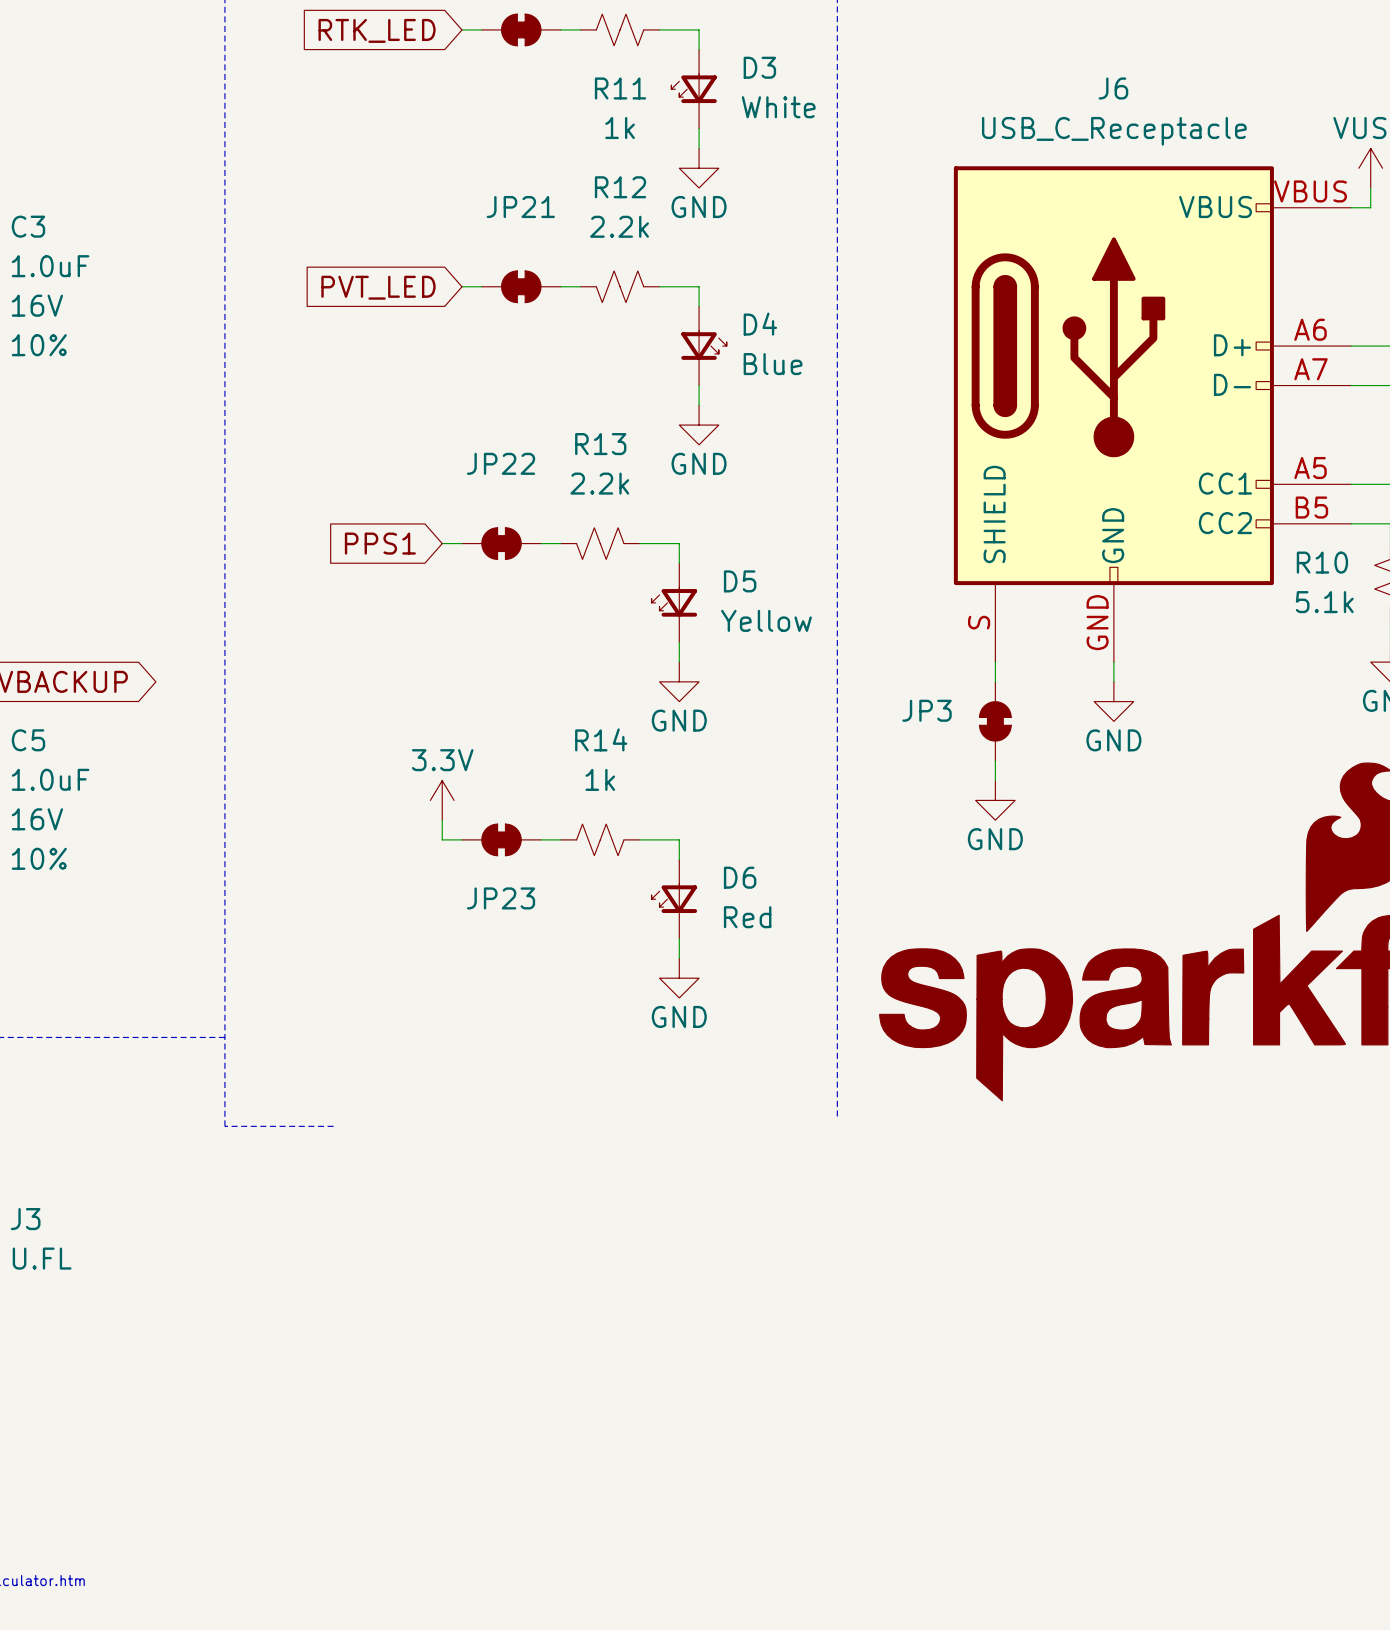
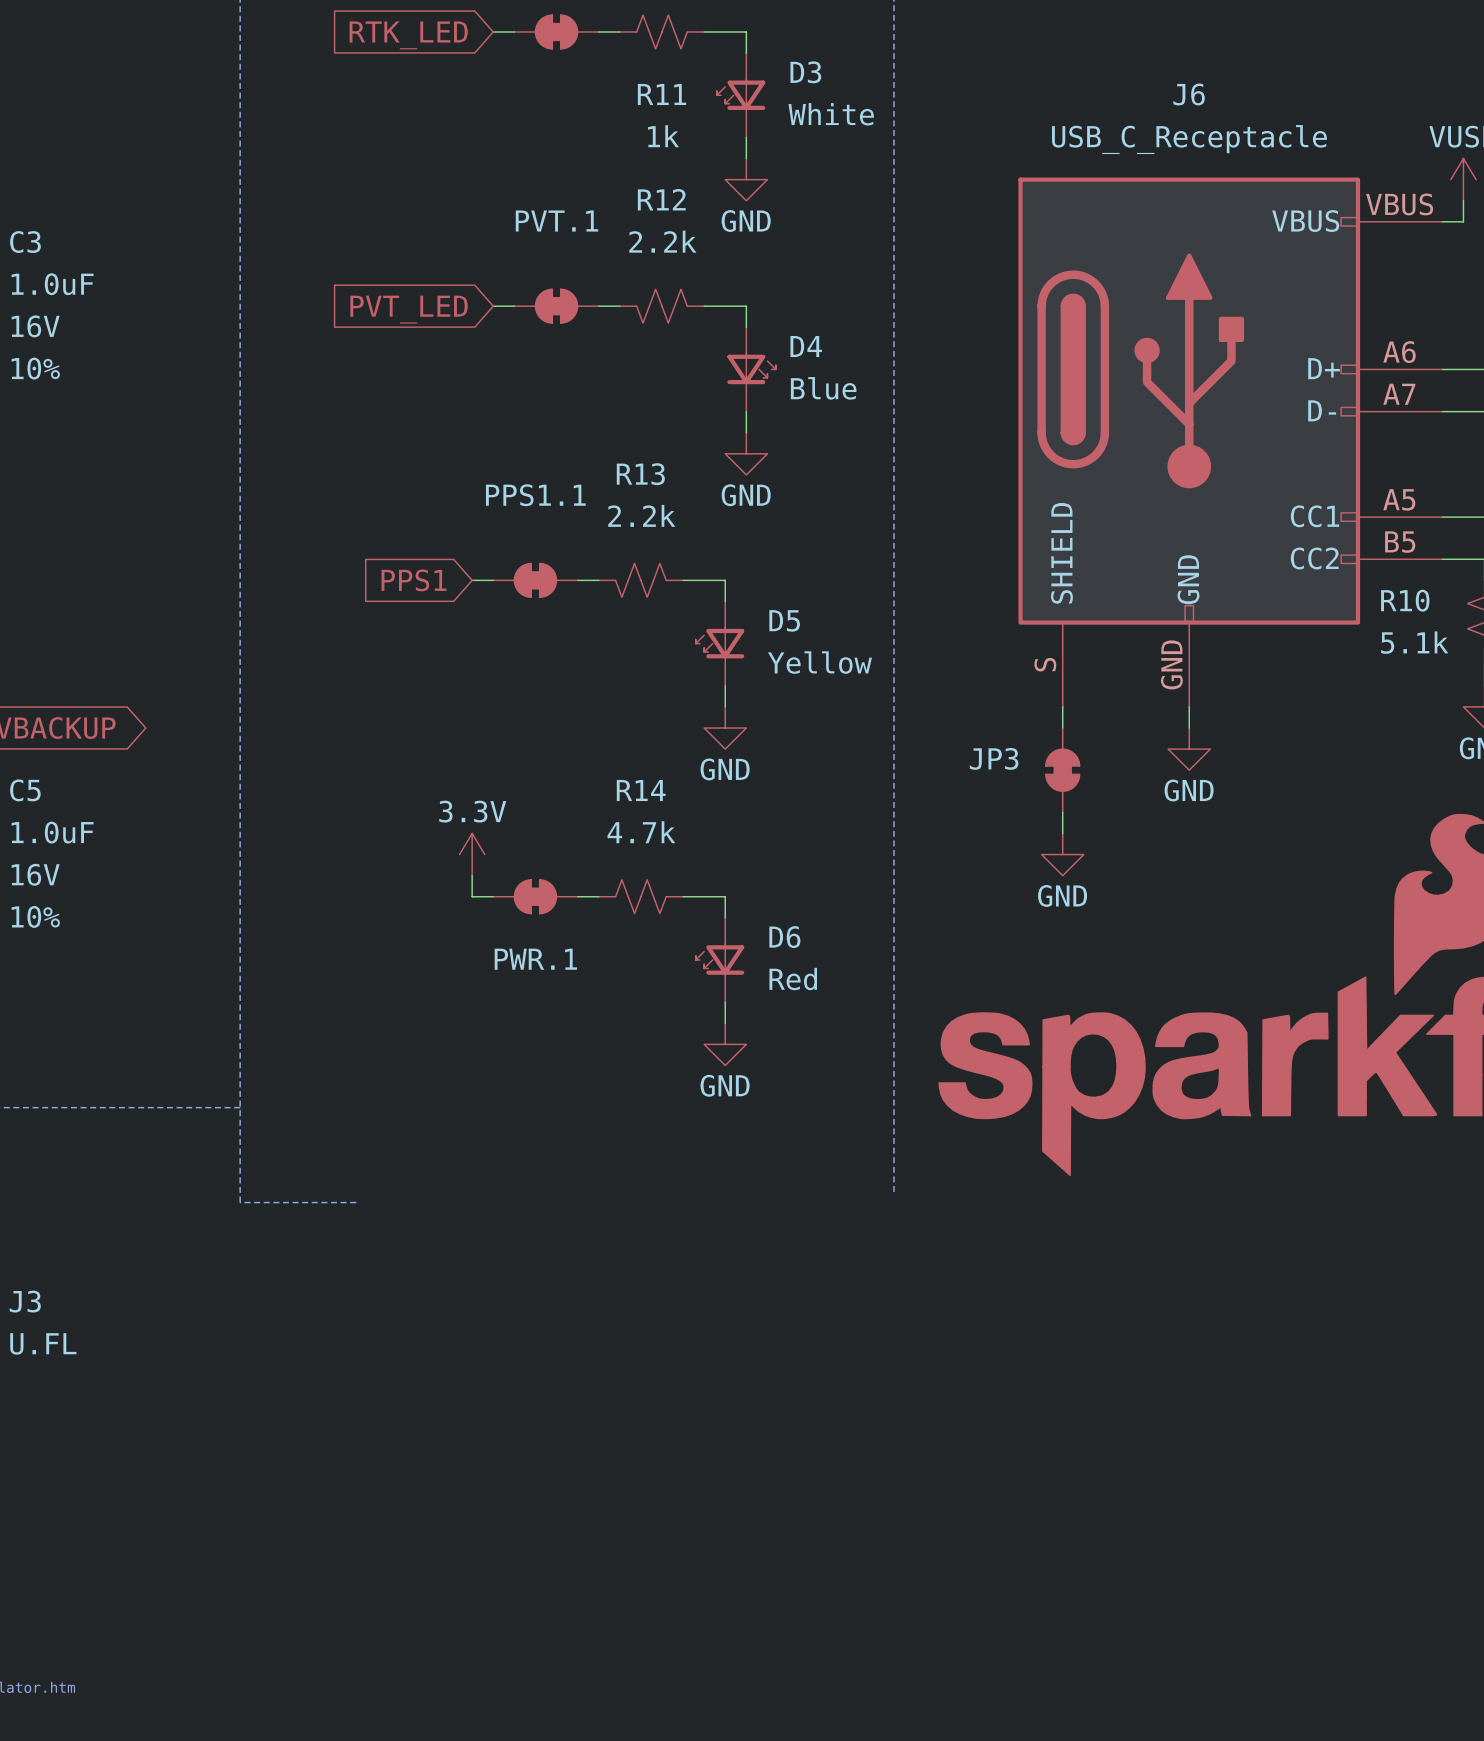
JP21 name: JP21 (520, 207) -> PVT.1 (556, 221)
JP22 name: JP22 (501, 463) -> PPS1.1 (535, 495)
R14 value: 1k (600, 779) -> 4.7k (641, 832)
JP23 name: JP23 (501, 898) -> PWR.1 (535, 959)

